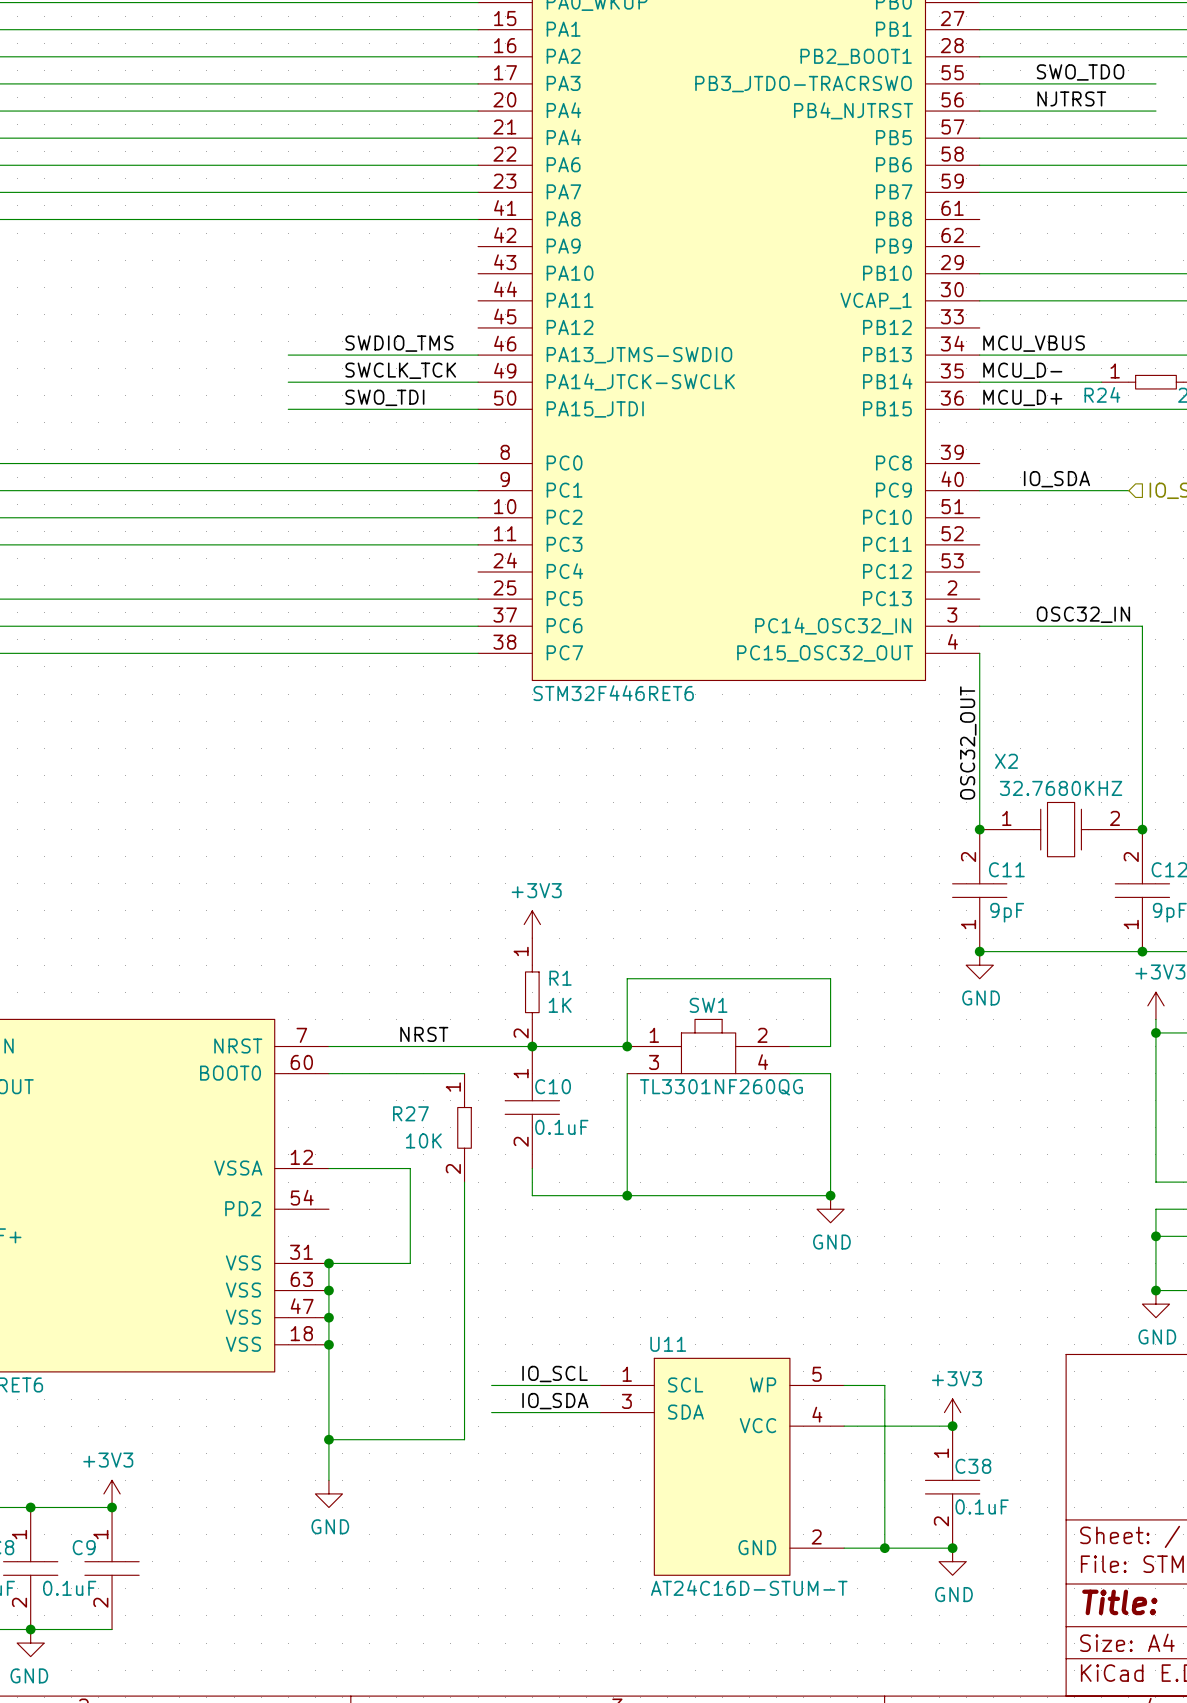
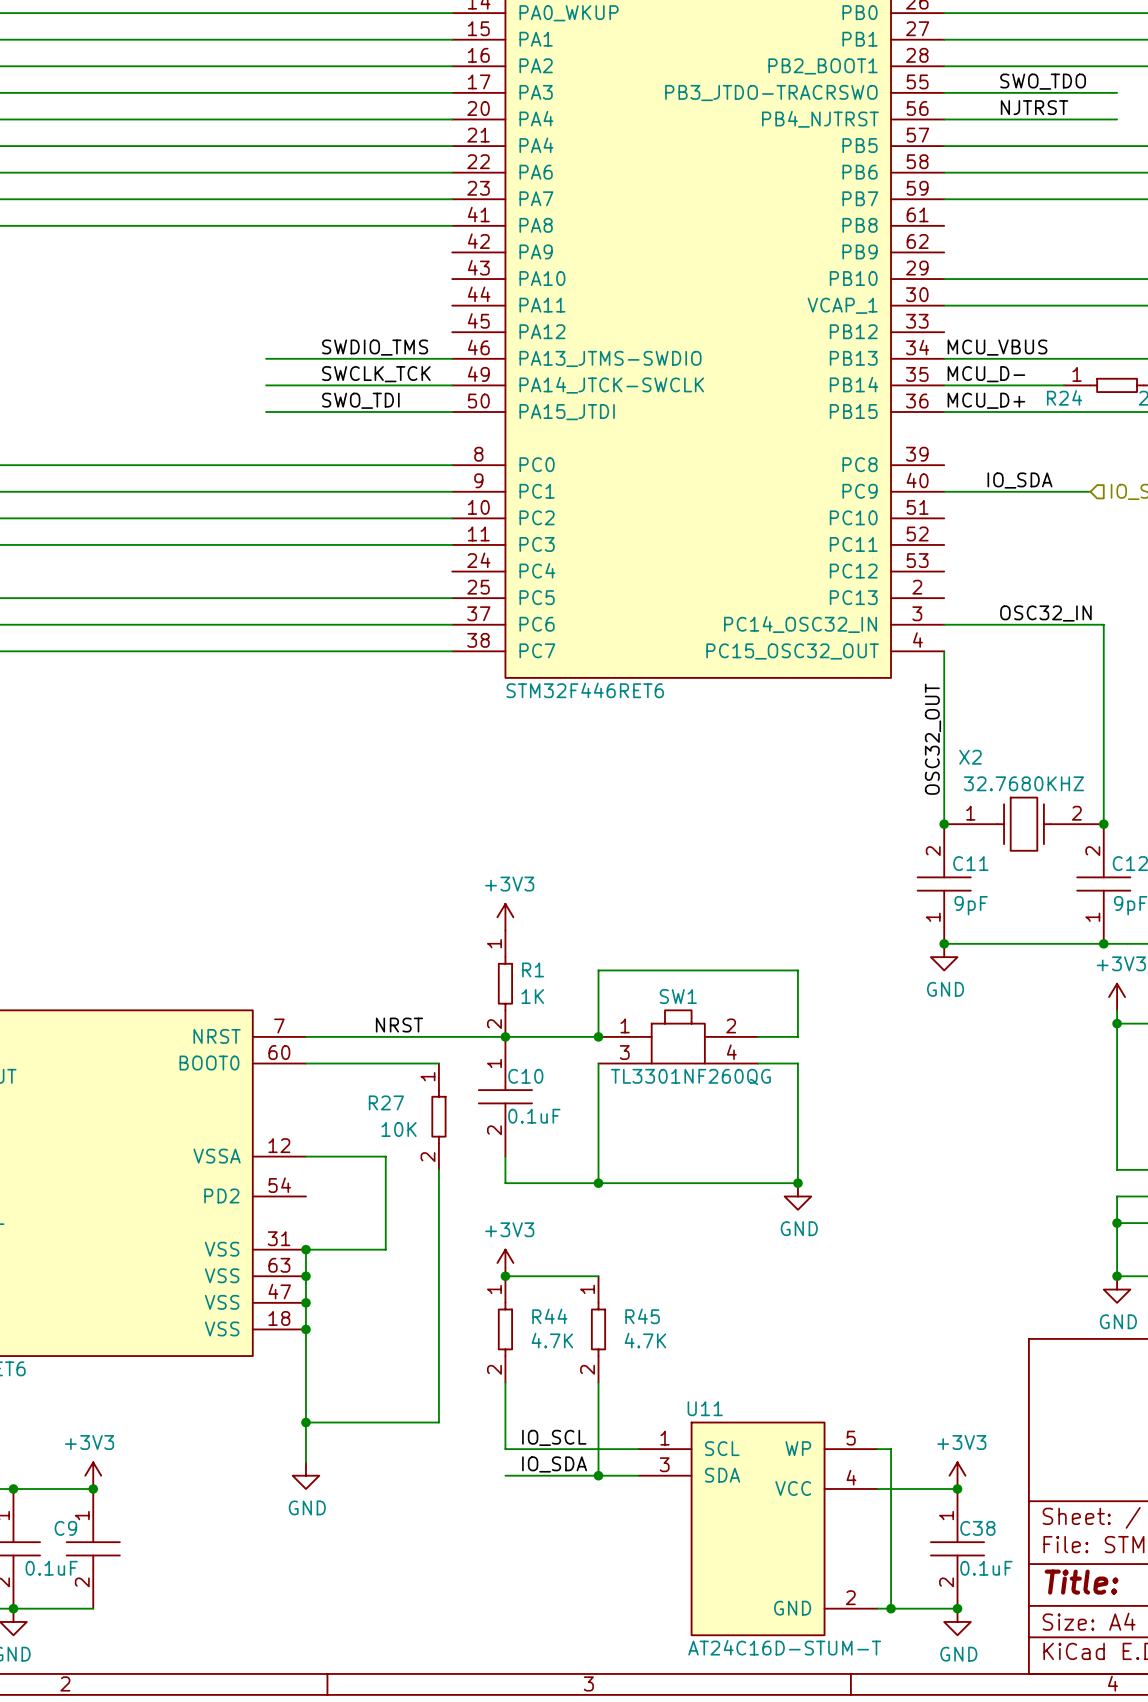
power symbol: none -> +3V3 (505, 1262)
wire: none -> (505, 1276) (598, 1276)
junction: none -> (505, 1276)
R44: none -> (505, 1329)
R45: none -> (598, 1329)
label position: IO_SCL (555, 1374) -> IO_SCL (554, 1437)
wire: (491, 1385) (600, 1385) -> none
wire: (844, 1385) (884, 1385) (884, 1548) -> none
wire: none -> (505, 1382) (505, 1449) (638, 1449)
wire: none -> (598, 1382) (598, 1475)
label position: IO_SDA (555, 1401) -> IO_SDA (554, 1464)
wire: (491, 1412) (600, 1412) -> none
power symbol position: +3V3 (952, 1412) -> +3V3 (957, 1475)
wire: (844, 1426) (952, 1426) -> none
junction: (952, 1426) -> none
U11 position: (722, 1466) -> (758, 1528)
wire: none -> (877, 1449) (891, 1449) (891, 1608)
C38 position: (952, 1487) -> (957, 1548)
wire: none -> (505, 1475) (638, 1475)
junction: none -> (598, 1475)
wire: none -> (877, 1489) (957, 1489)
junction: none -> (957, 1489)
wire: (844, 1548) (952, 1548) -> none
junction: (884, 1548) -> none
junction: (952, 1548) -> none
power symbol position: GND (952, 1561) -> GND (957, 1621)
wire: none -> (877, 1608) (957, 1608)
junction: none -> (891, 1608)
junction: none -> (957, 1608)

